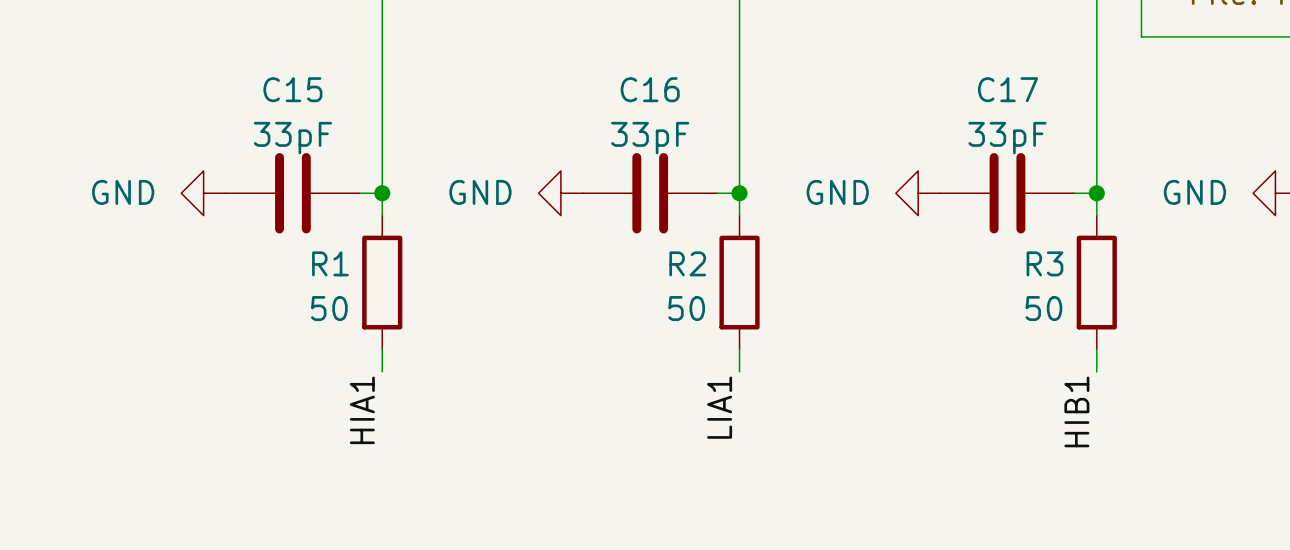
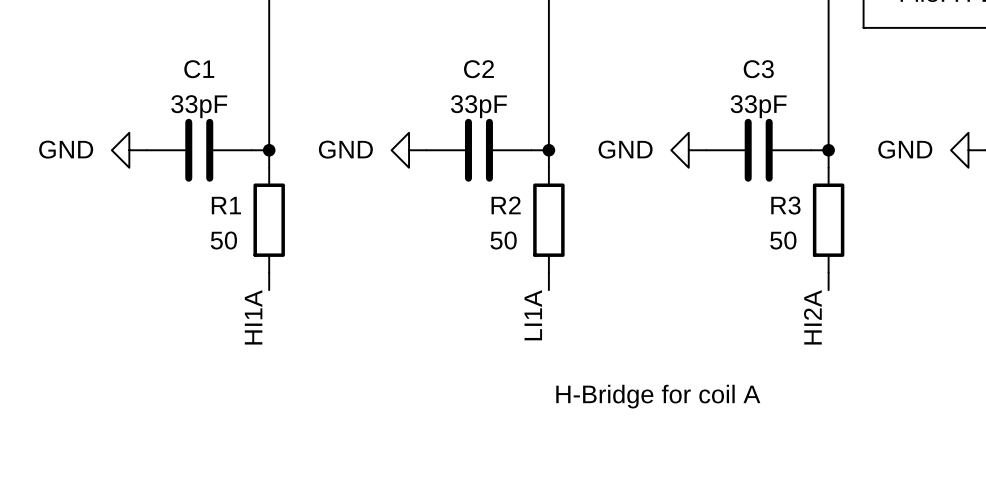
C15 name: C15 (292, 89) -> C1 (199, 69)
C16 name: C16 (650, 89) -> C2 (478, 69)
C17 name: C17 (1008, 89) -> C3 (758, 69)
label: LIA1 (719, 407) -> LI1A (533, 315)
label: HIA1 (362, 410) -> HI1A (253, 317)
label: HIB1 (1076, 411) -> HI2A (812, 317)
text: none -> H-Bridge for coil A (658, 396)

